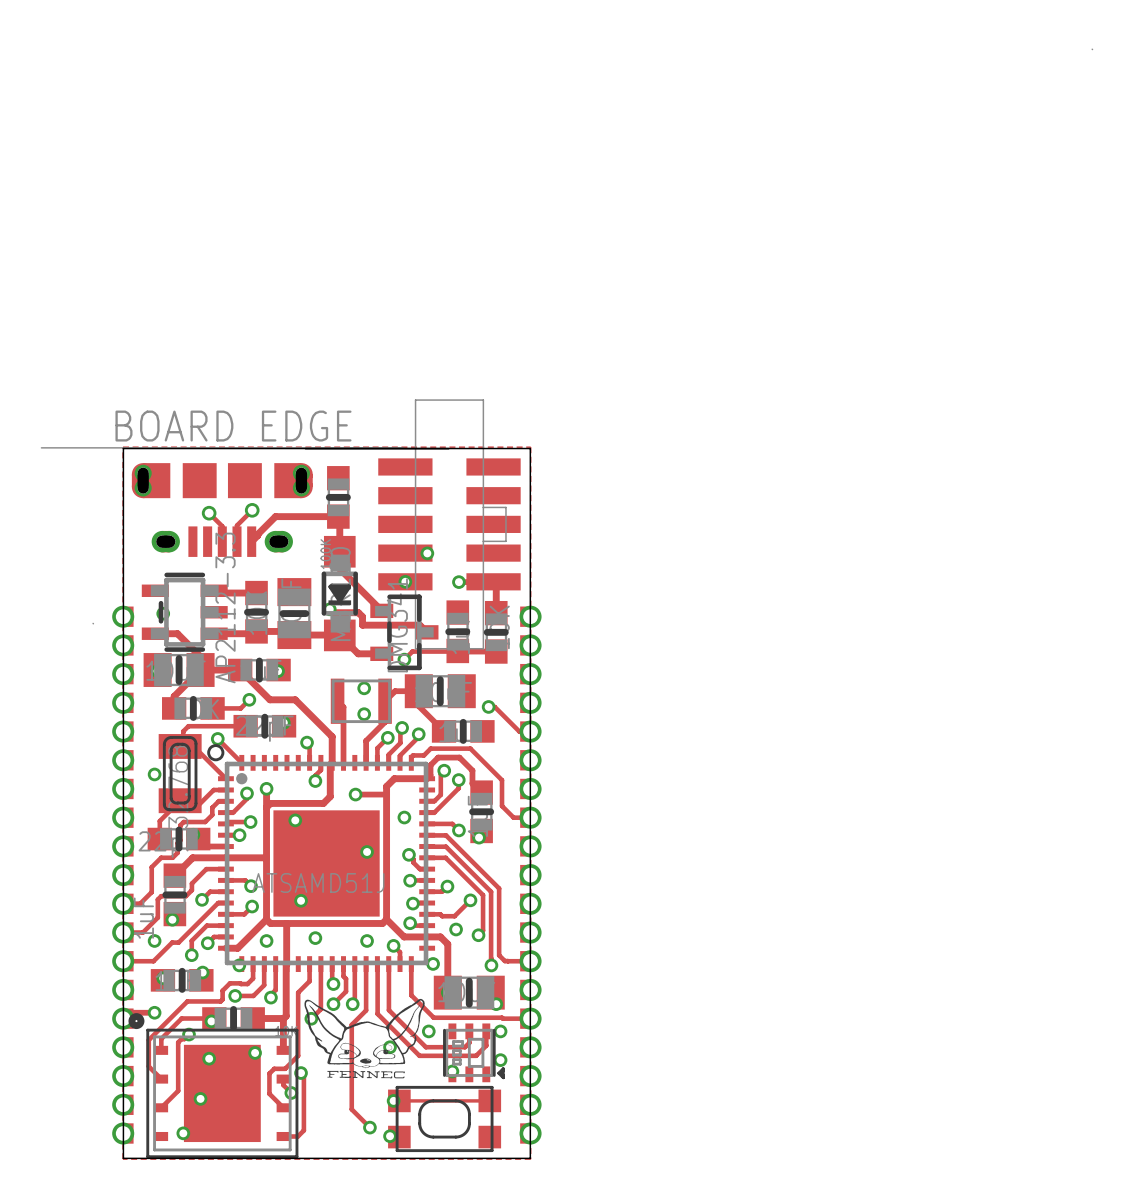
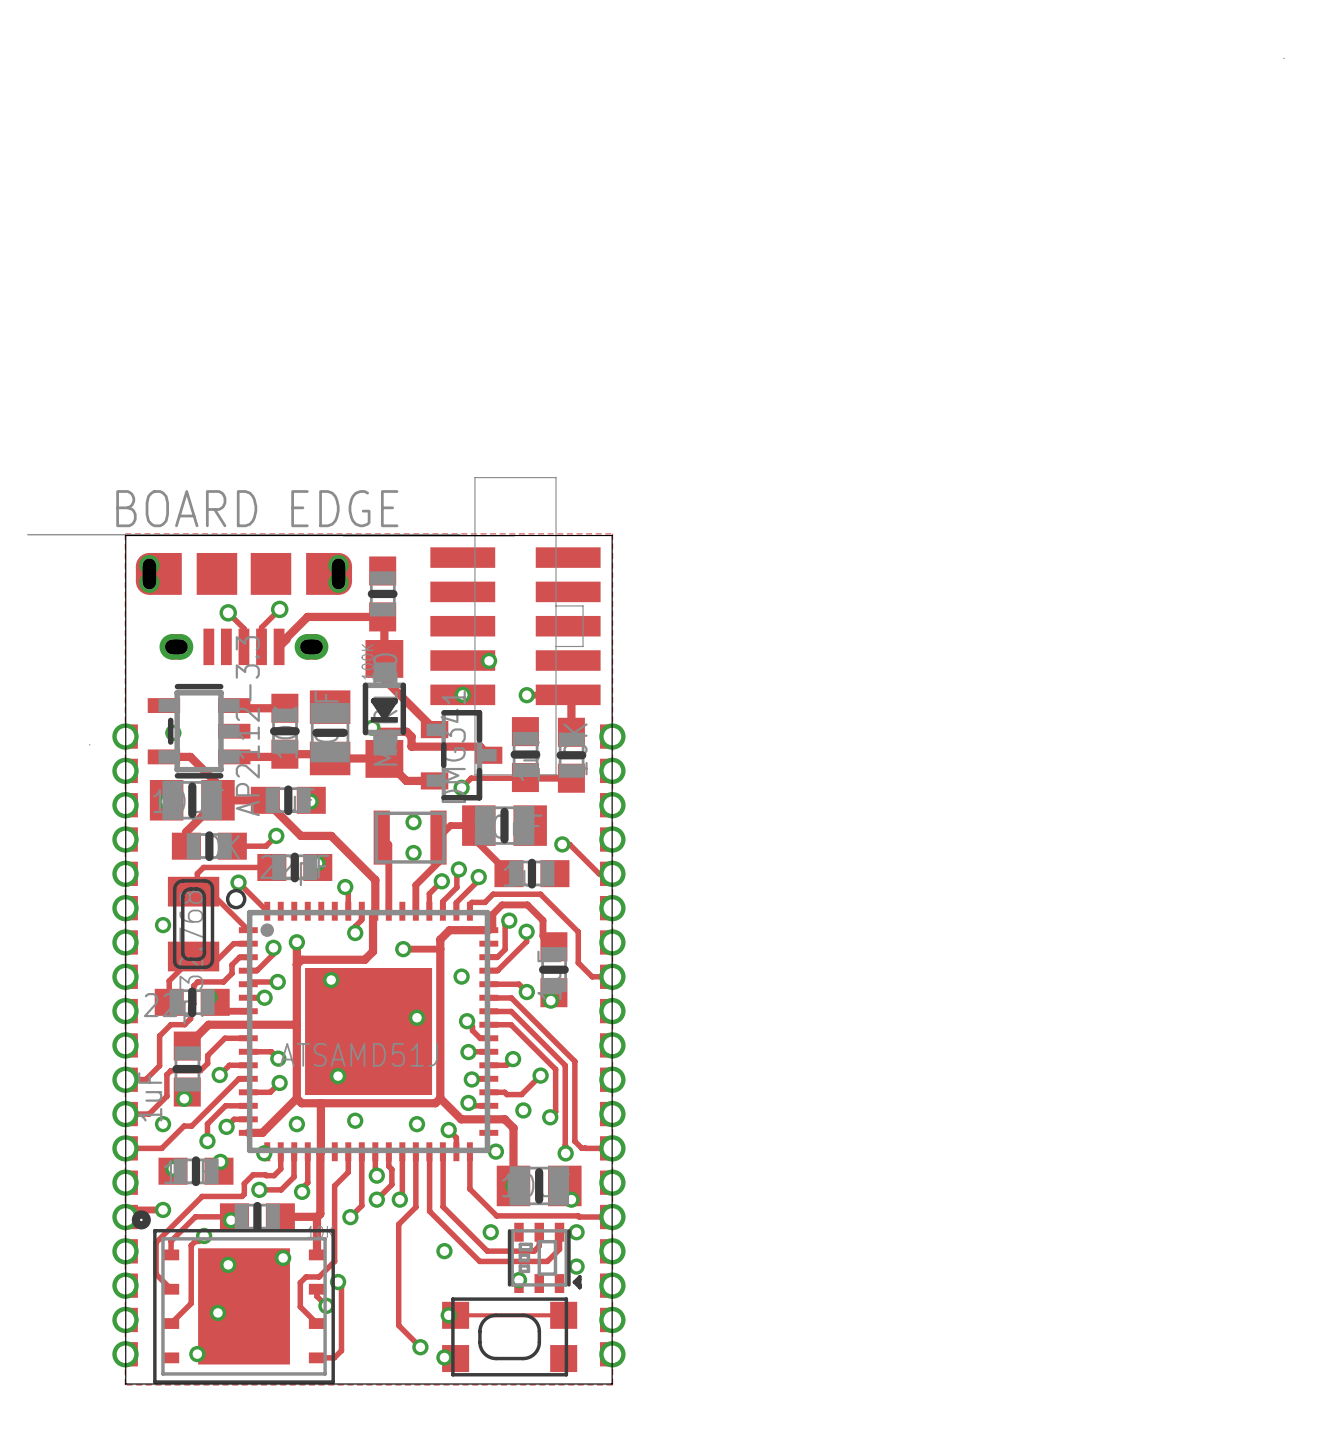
drawing: [304, 998, 425, 1079] -> none

